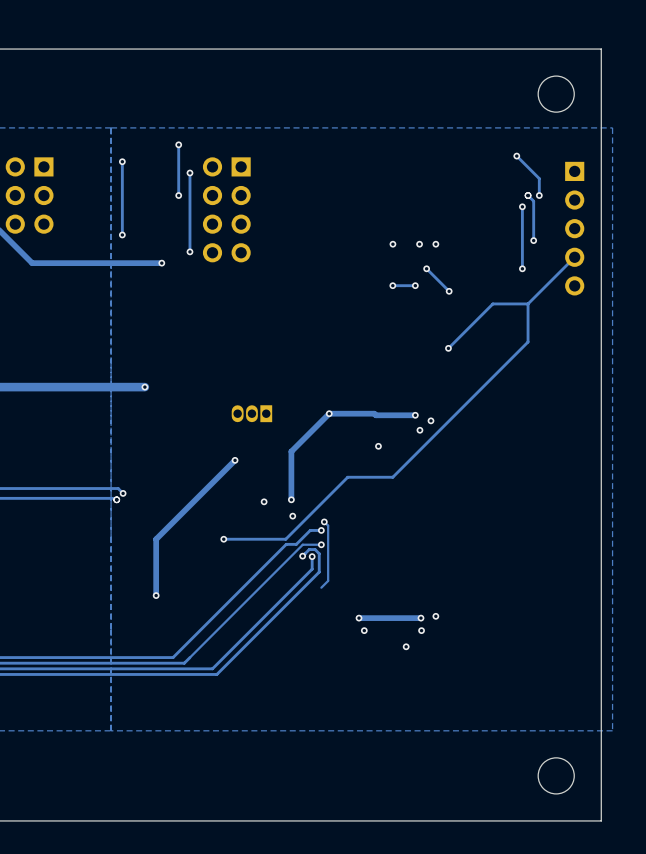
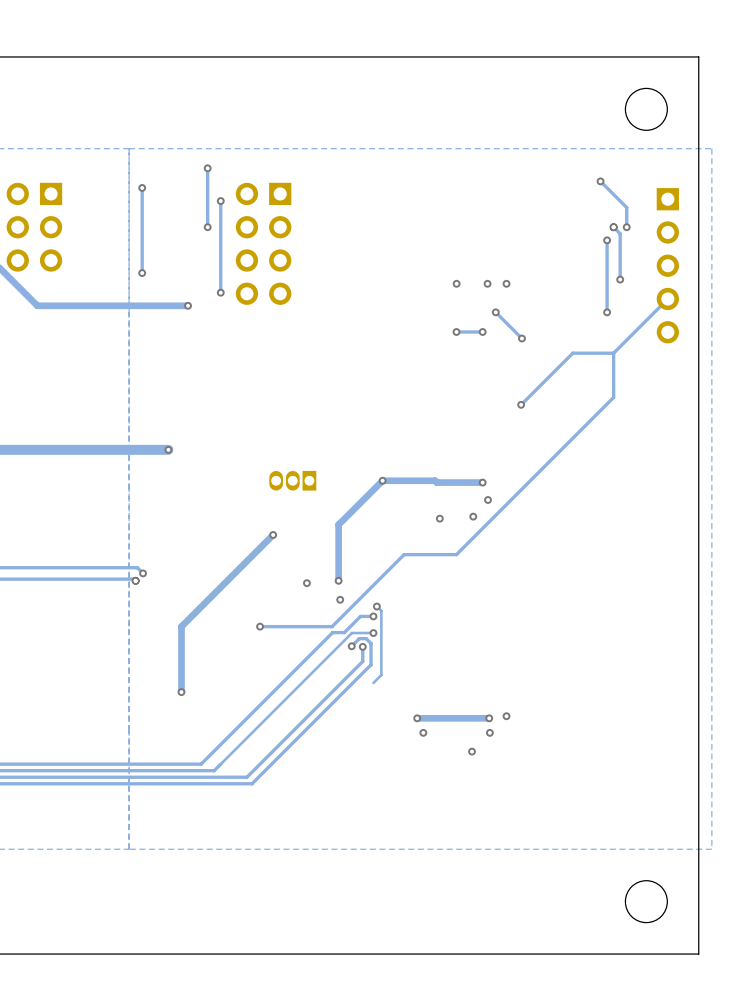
via position: (430, 420) -> (473, 516)

